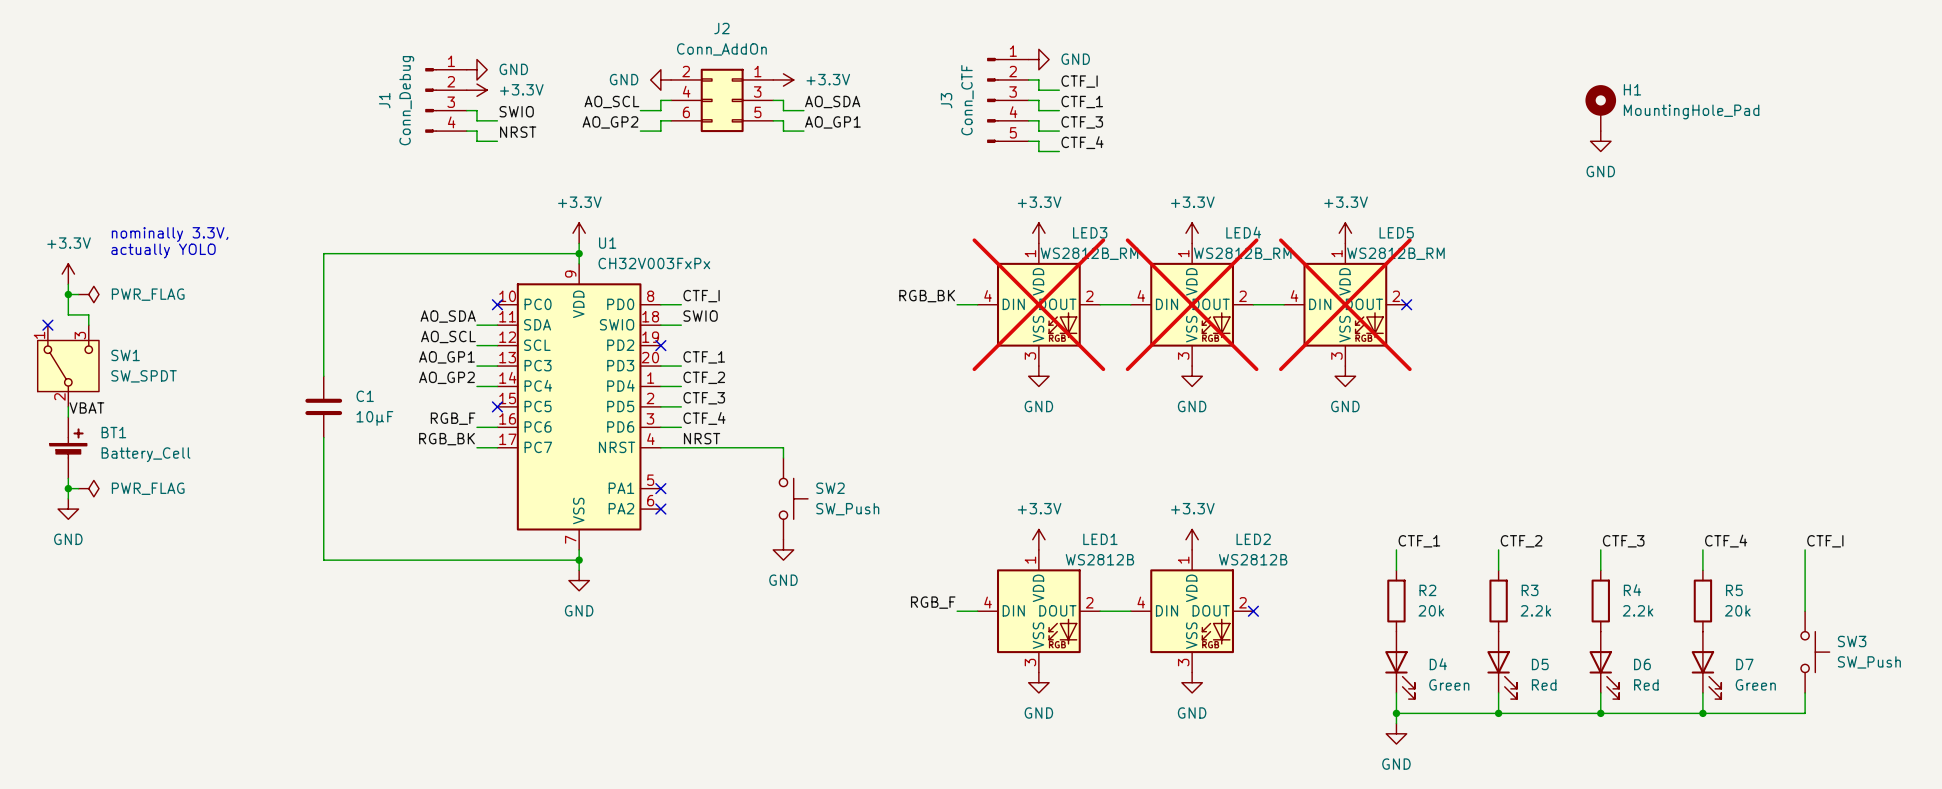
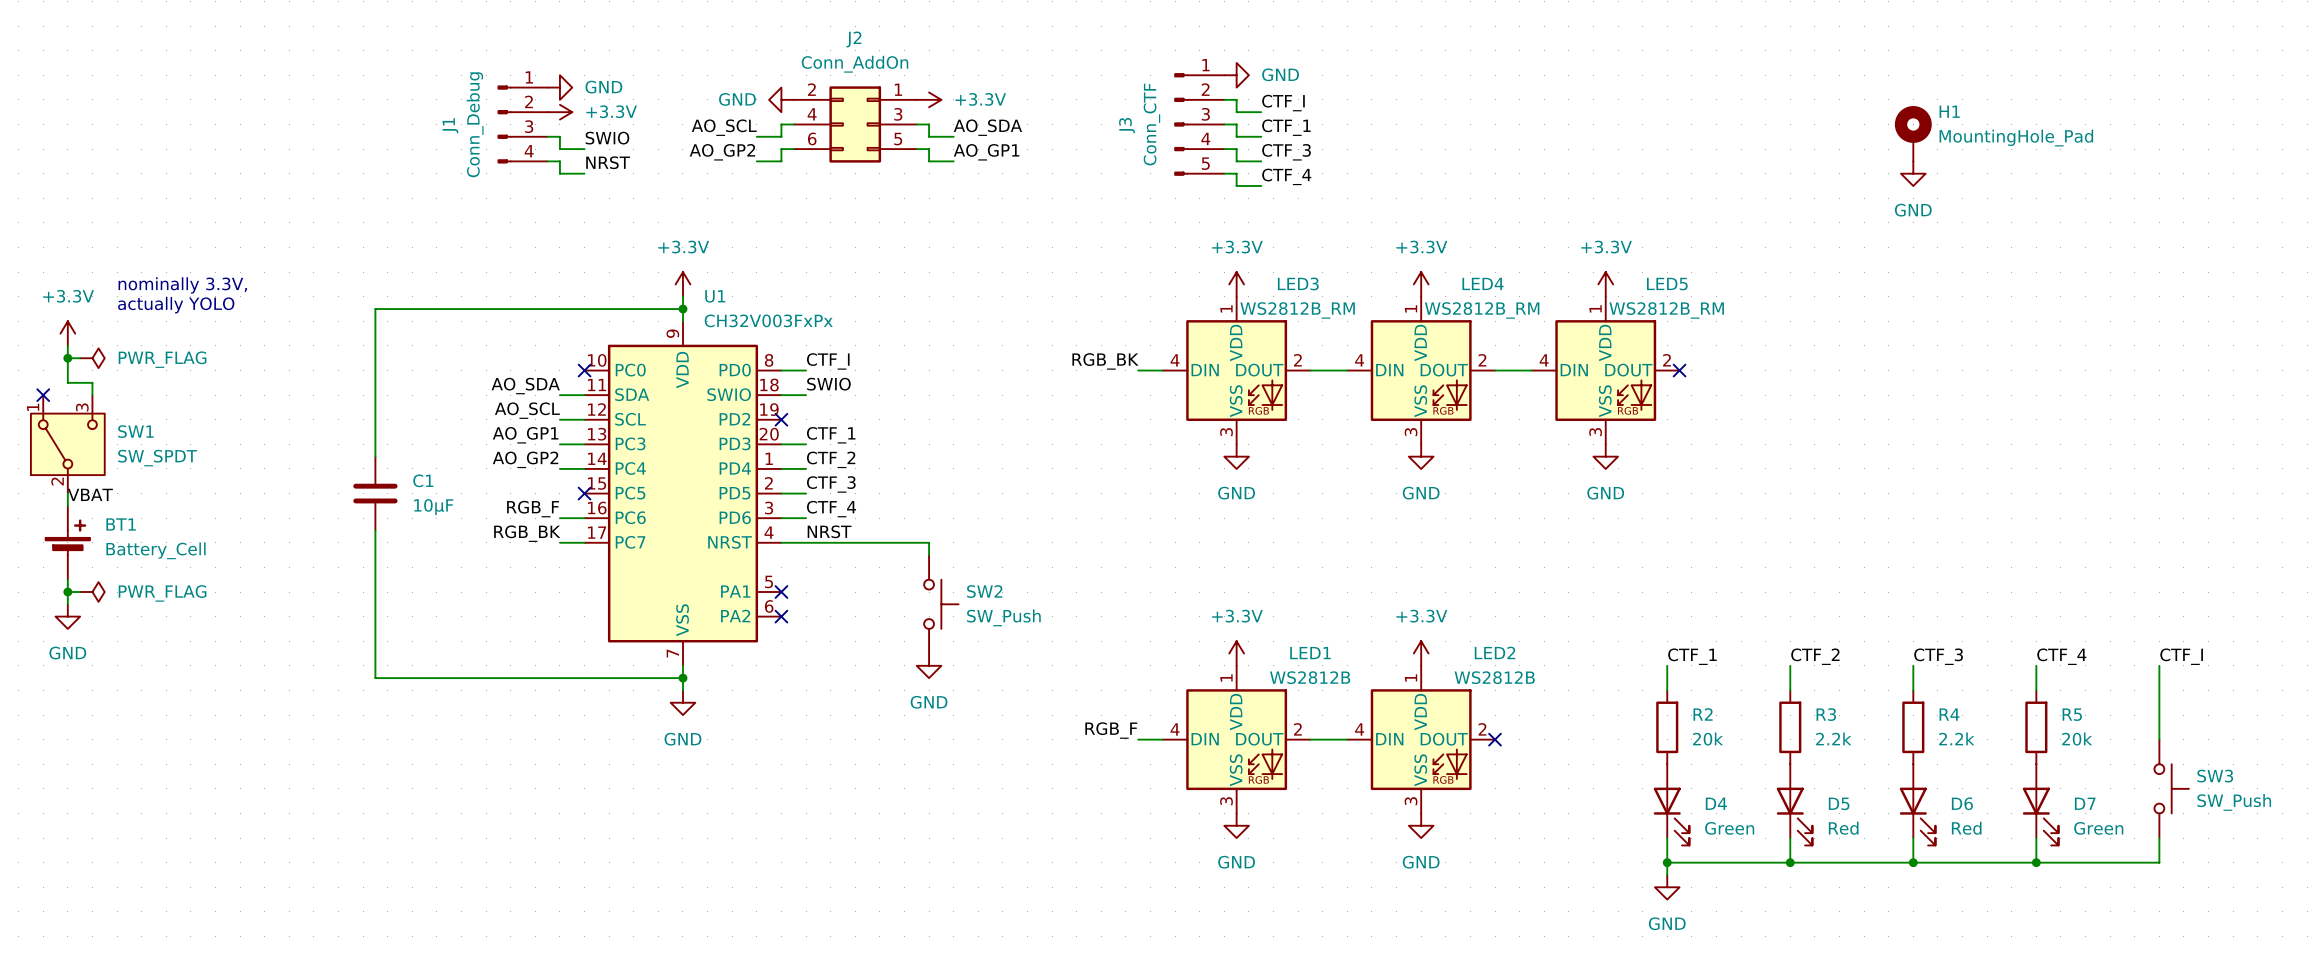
LED3 do-not-place cross: (1038, 304) -> none
LED4 do-not-place cross: (1192, 304) -> none
LED5 do-not-place cross: (1345, 304) -> none

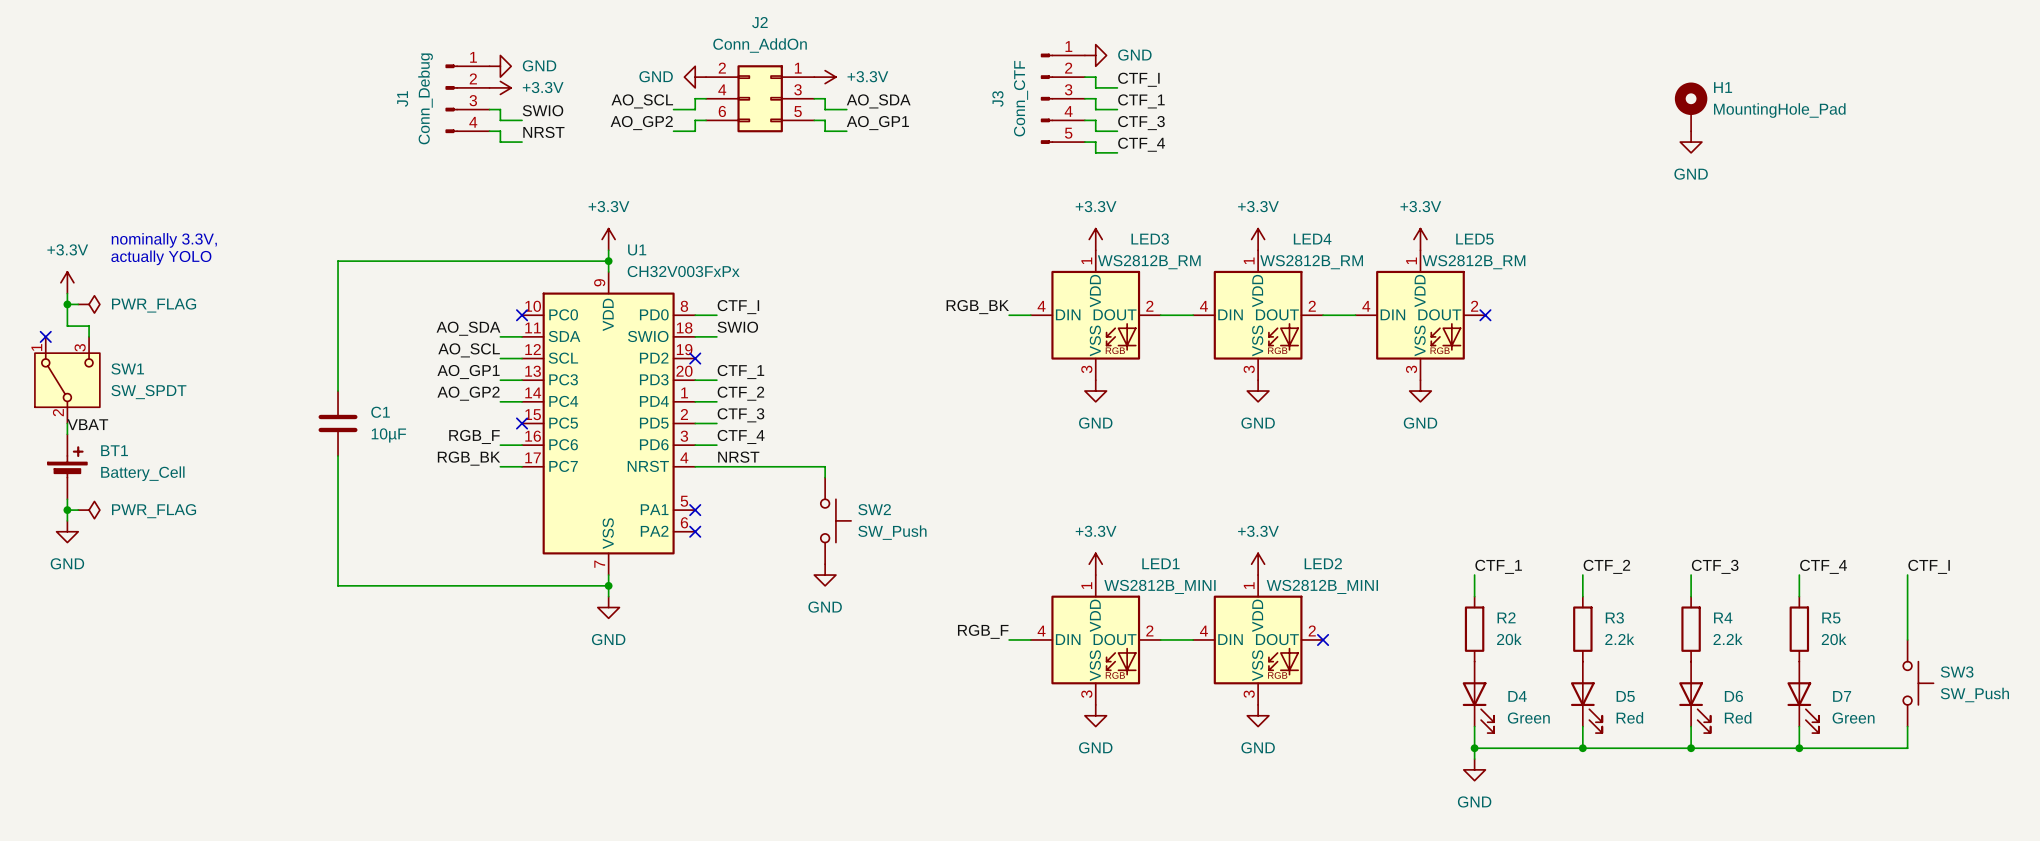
LED1 value: WS2812B (1310, 677) -> WS2812B_MINI (1159, 586)
LED2 value: WS2812B (1494, 677) -> WS2812B_MINI (1322, 586)

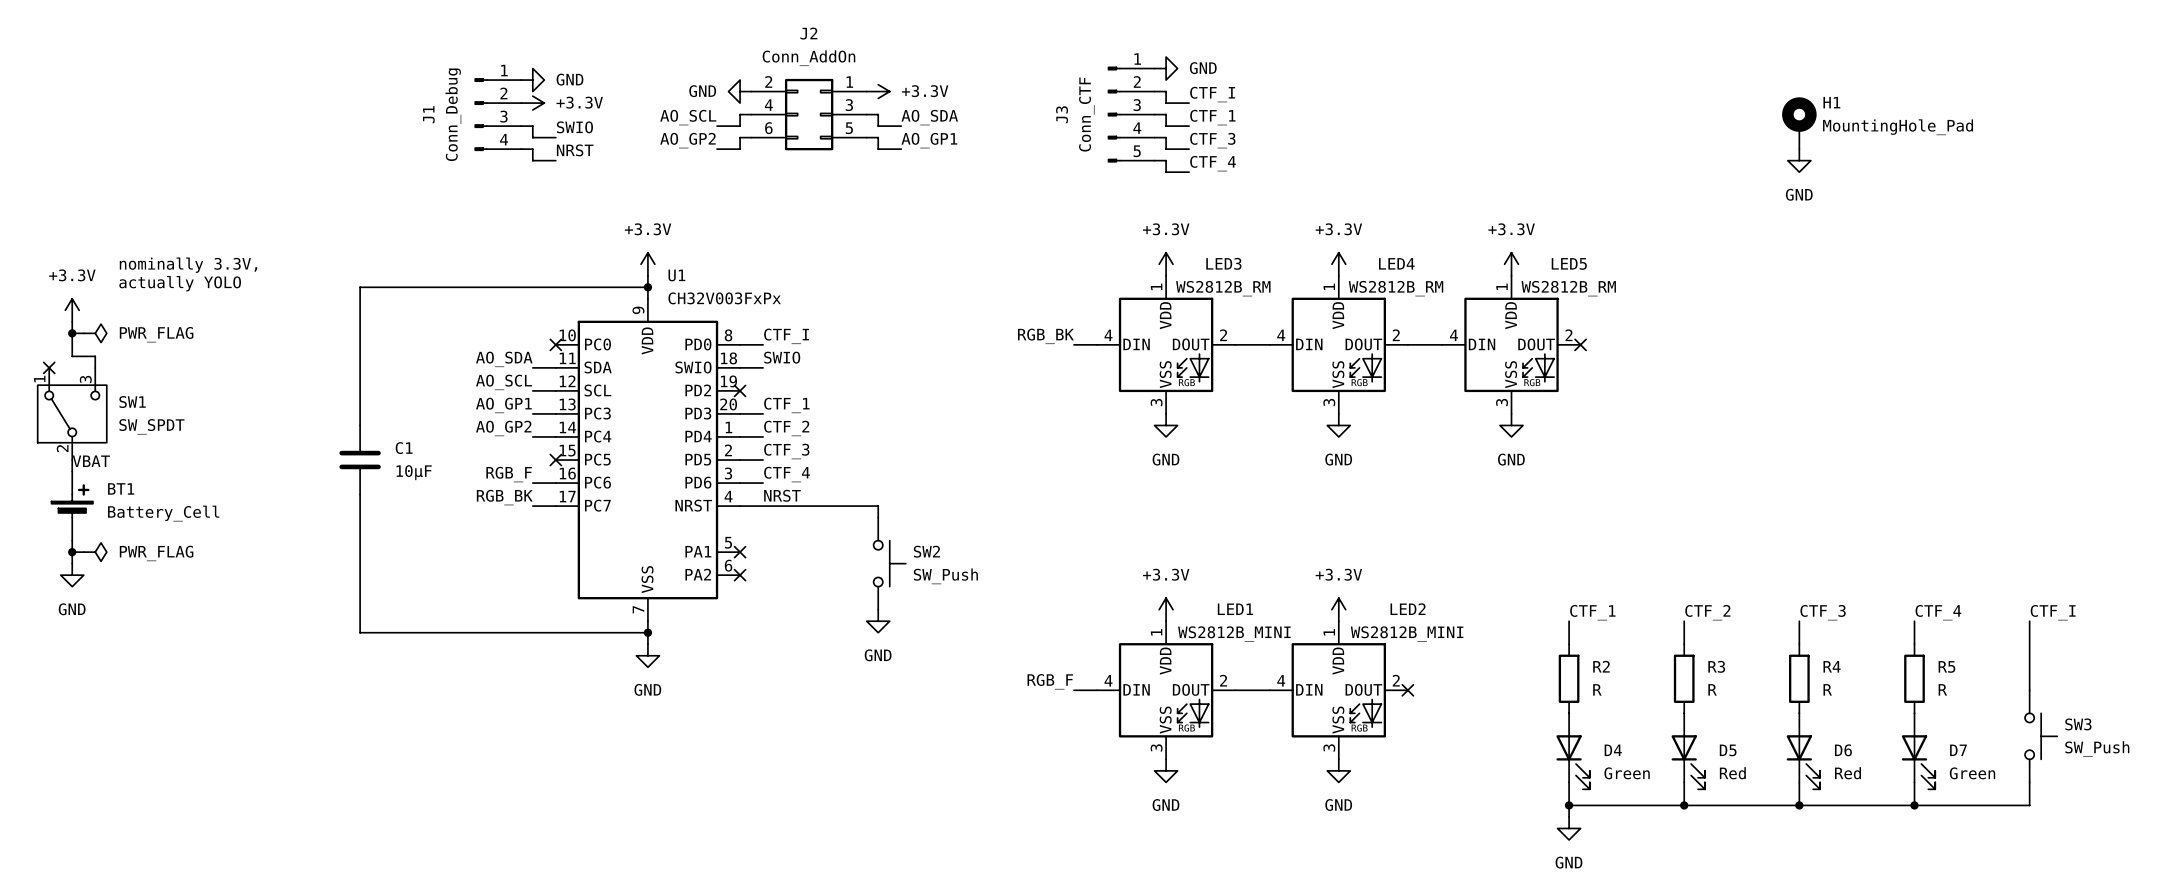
R2 value: 20k (1509, 639) -> R (1597, 689)
R3 value: 2.2k (1619, 639) -> R (1712, 689)
R4 value: 2.2k (1728, 639) -> R (1827, 689)
R5 value: 20k (1834, 639) -> R (1942, 689)

